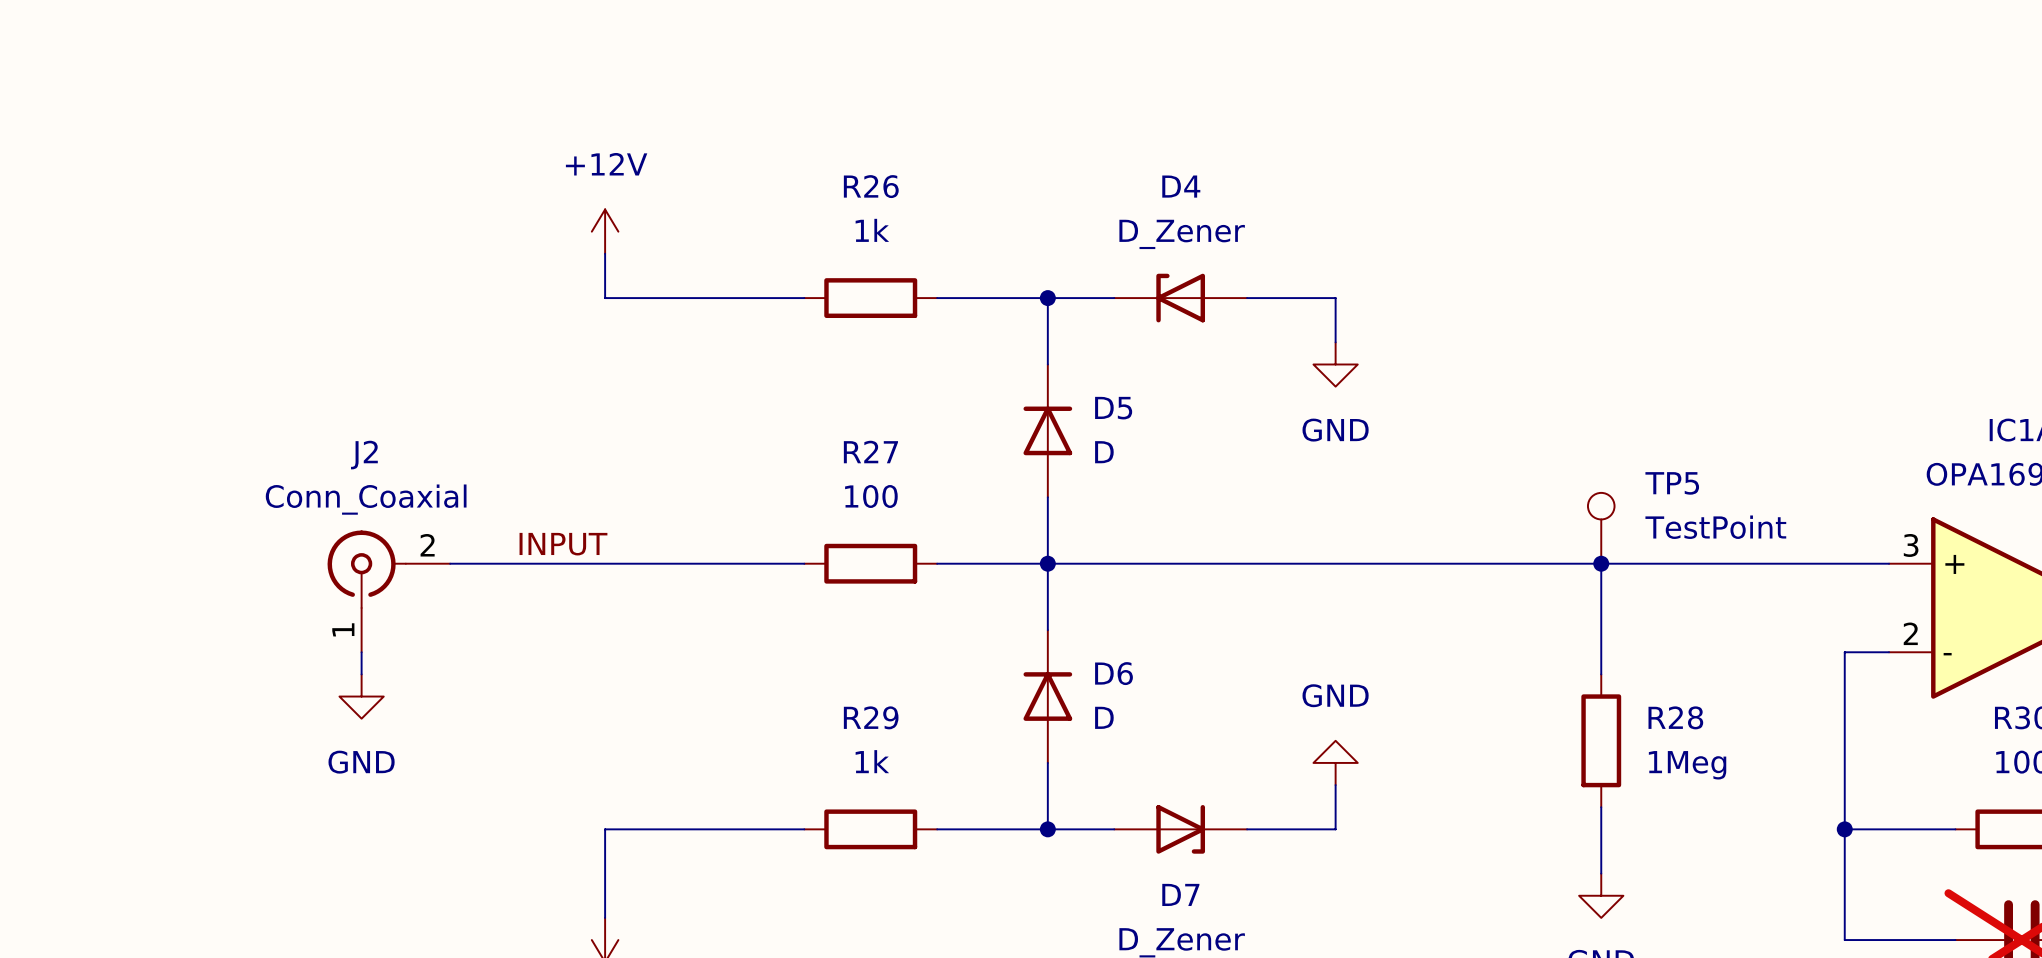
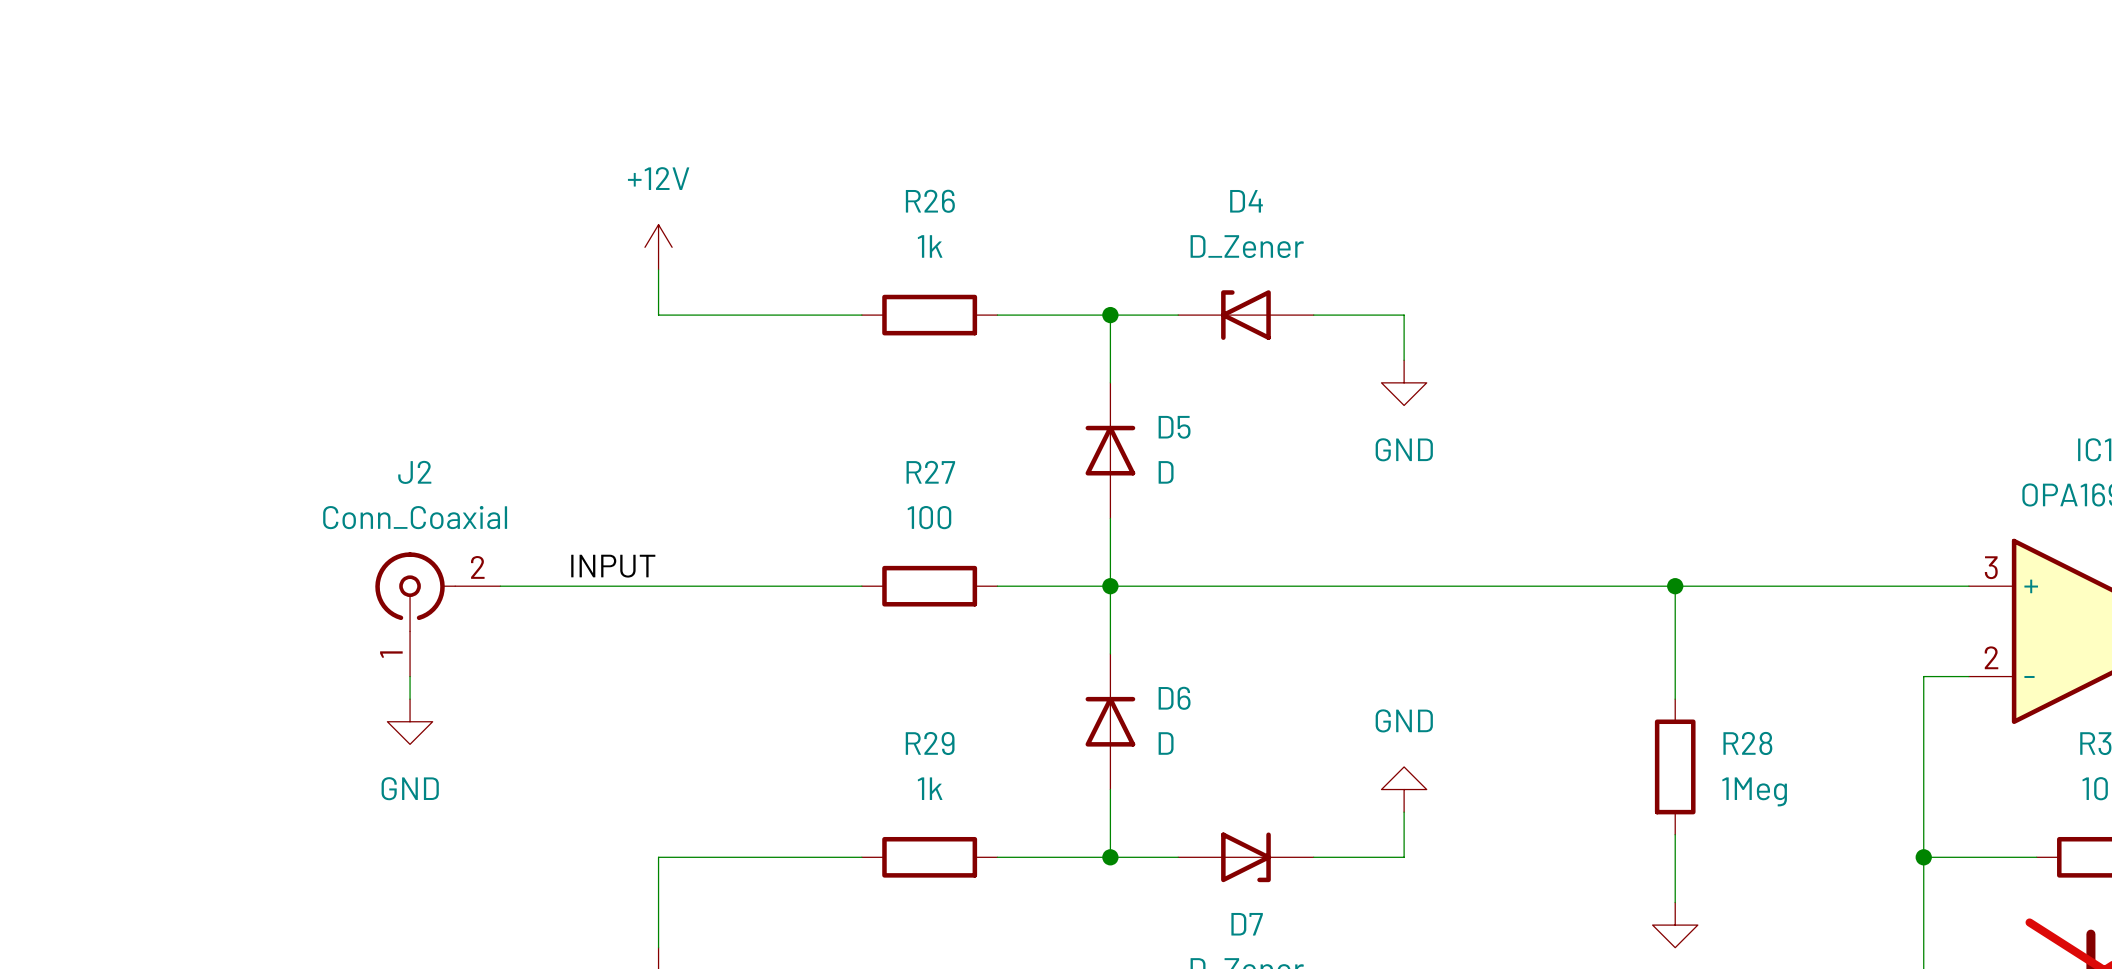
TP5: TestPoint (1601, 528) -> none

